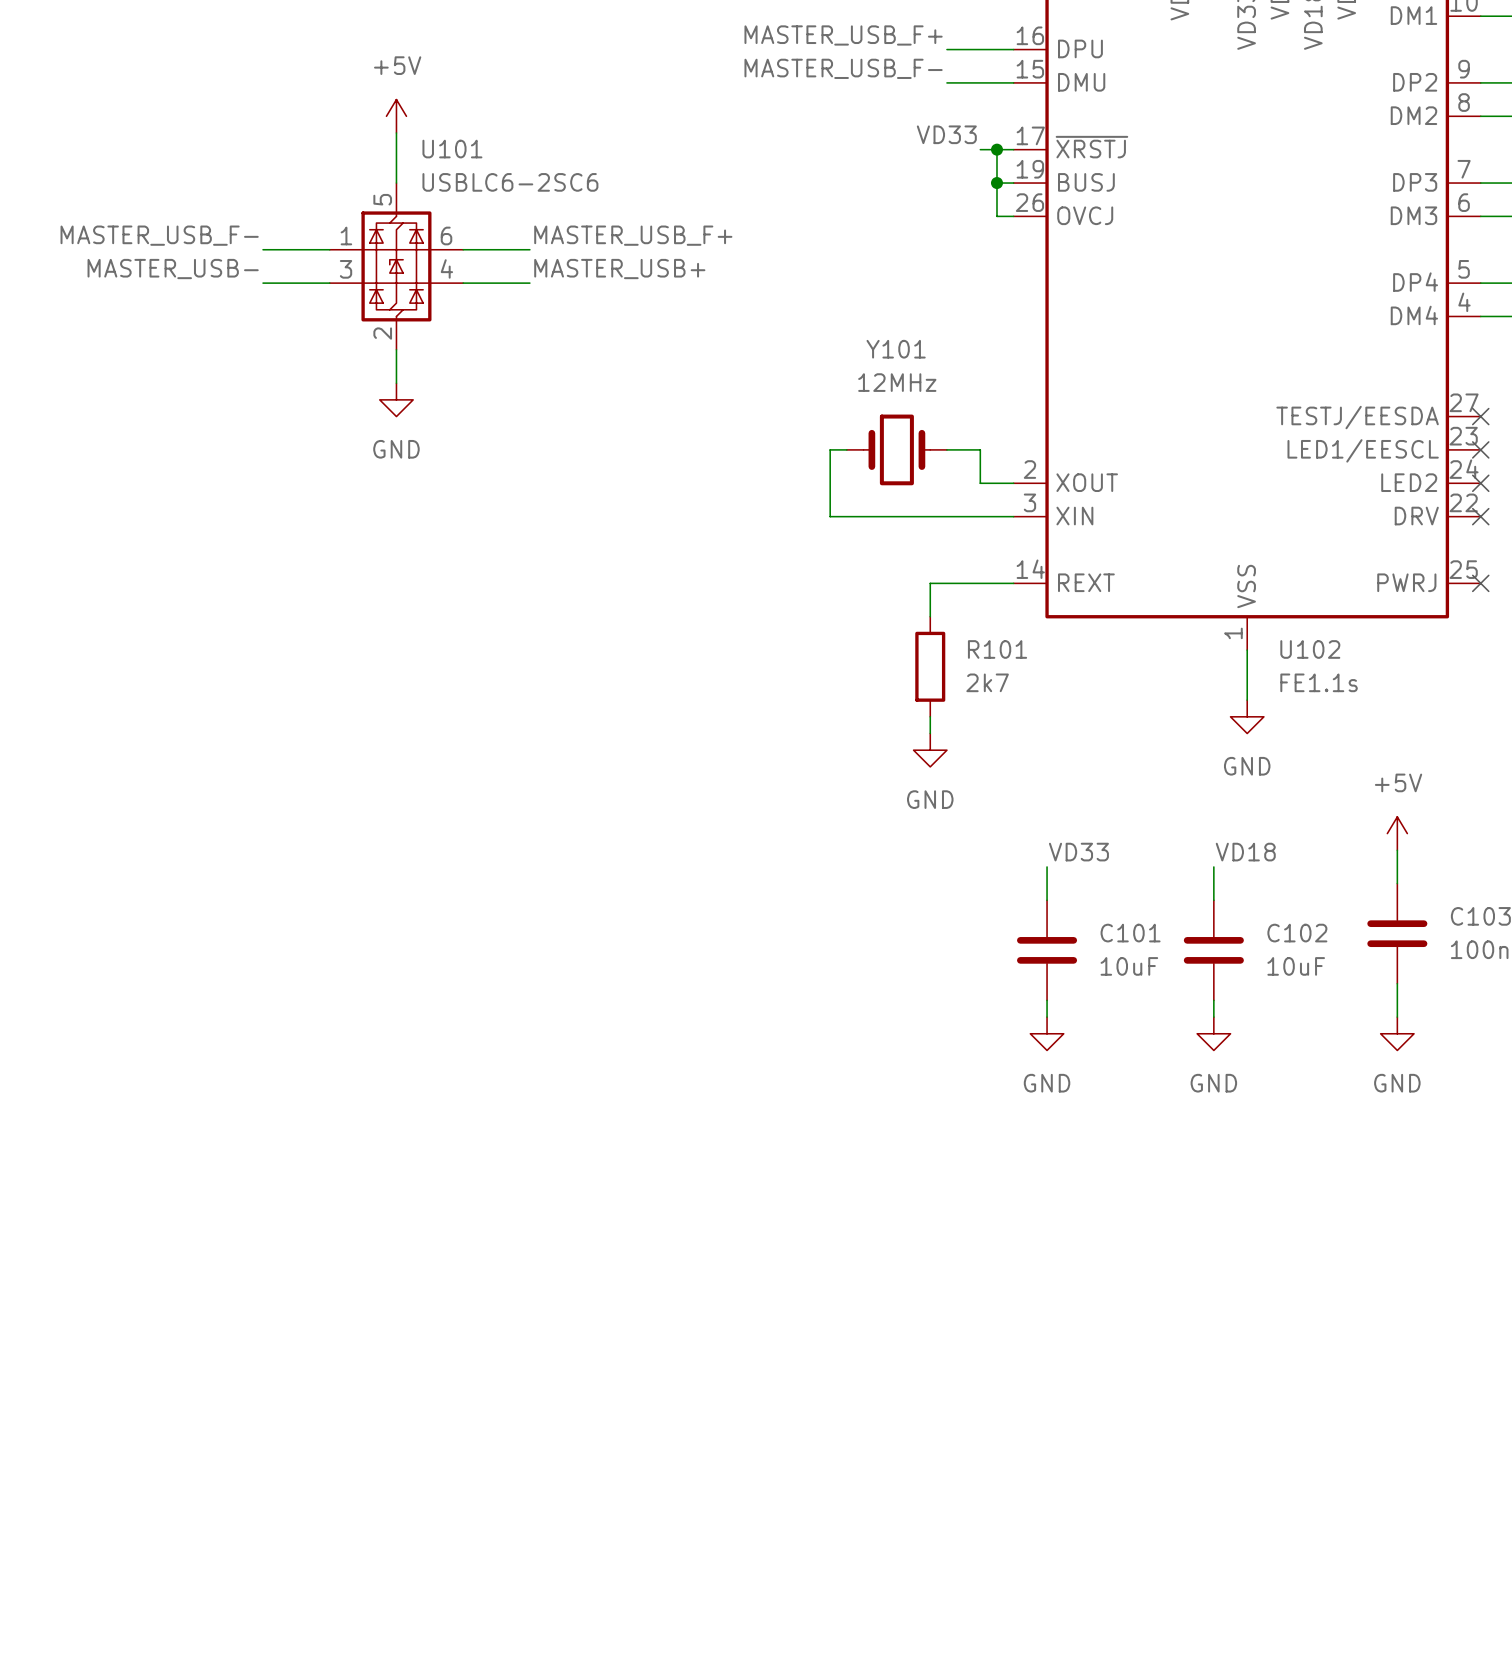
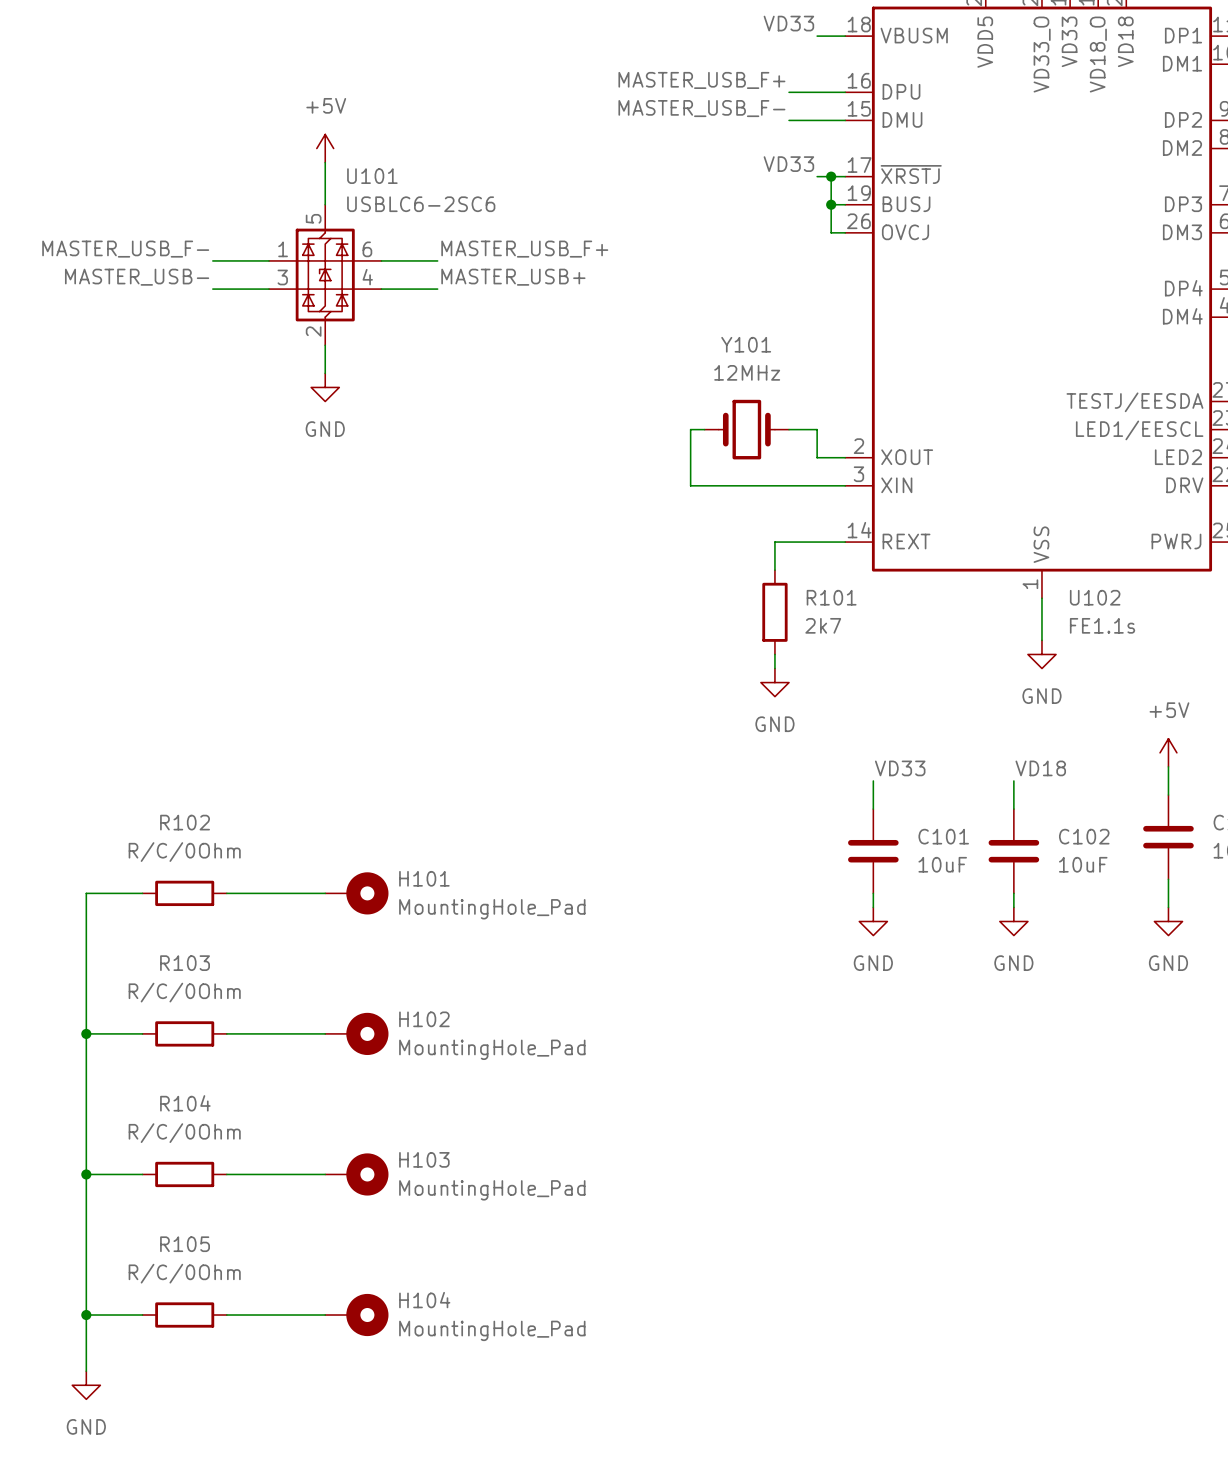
wire: none -> (142, 893) (86, 893) (86, 1371)
R102: none -> R/C/0Ohm (184, 893)
wire: none -> (226, 893) (325, 893)
H101: none -> MountingHole_Pad (356, 893)
wire: none -> (86, 1033) (142, 1033)
junction: none -> (86, 1033)
R103: none -> R/C/0Ohm (184, 1033)
wire: none -> (226, 1033) (325, 1033)
H102: none -> MountingHole_Pad (356, 1033)
wire: none -> (86, 1174) (142, 1174)
junction: none -> (86, 1174)
R104: none -> R/C/0Ohm (184, 1174)
wire: none -> (226, 1174) (325, 1174)
H103: none -> MountingHole_Pad (356, 1174)
wire: none -> (86, 1315) (142, 1315)
junction: none -> (86, 1315)
R105: none -> R/C/0Ohm (184, 1315)
wire: none -> (226, 1315) (325, 1315)
H104: none -> MountingHole_Pad (356, 1315)
power symbol: none -> GND (86, 1385)

